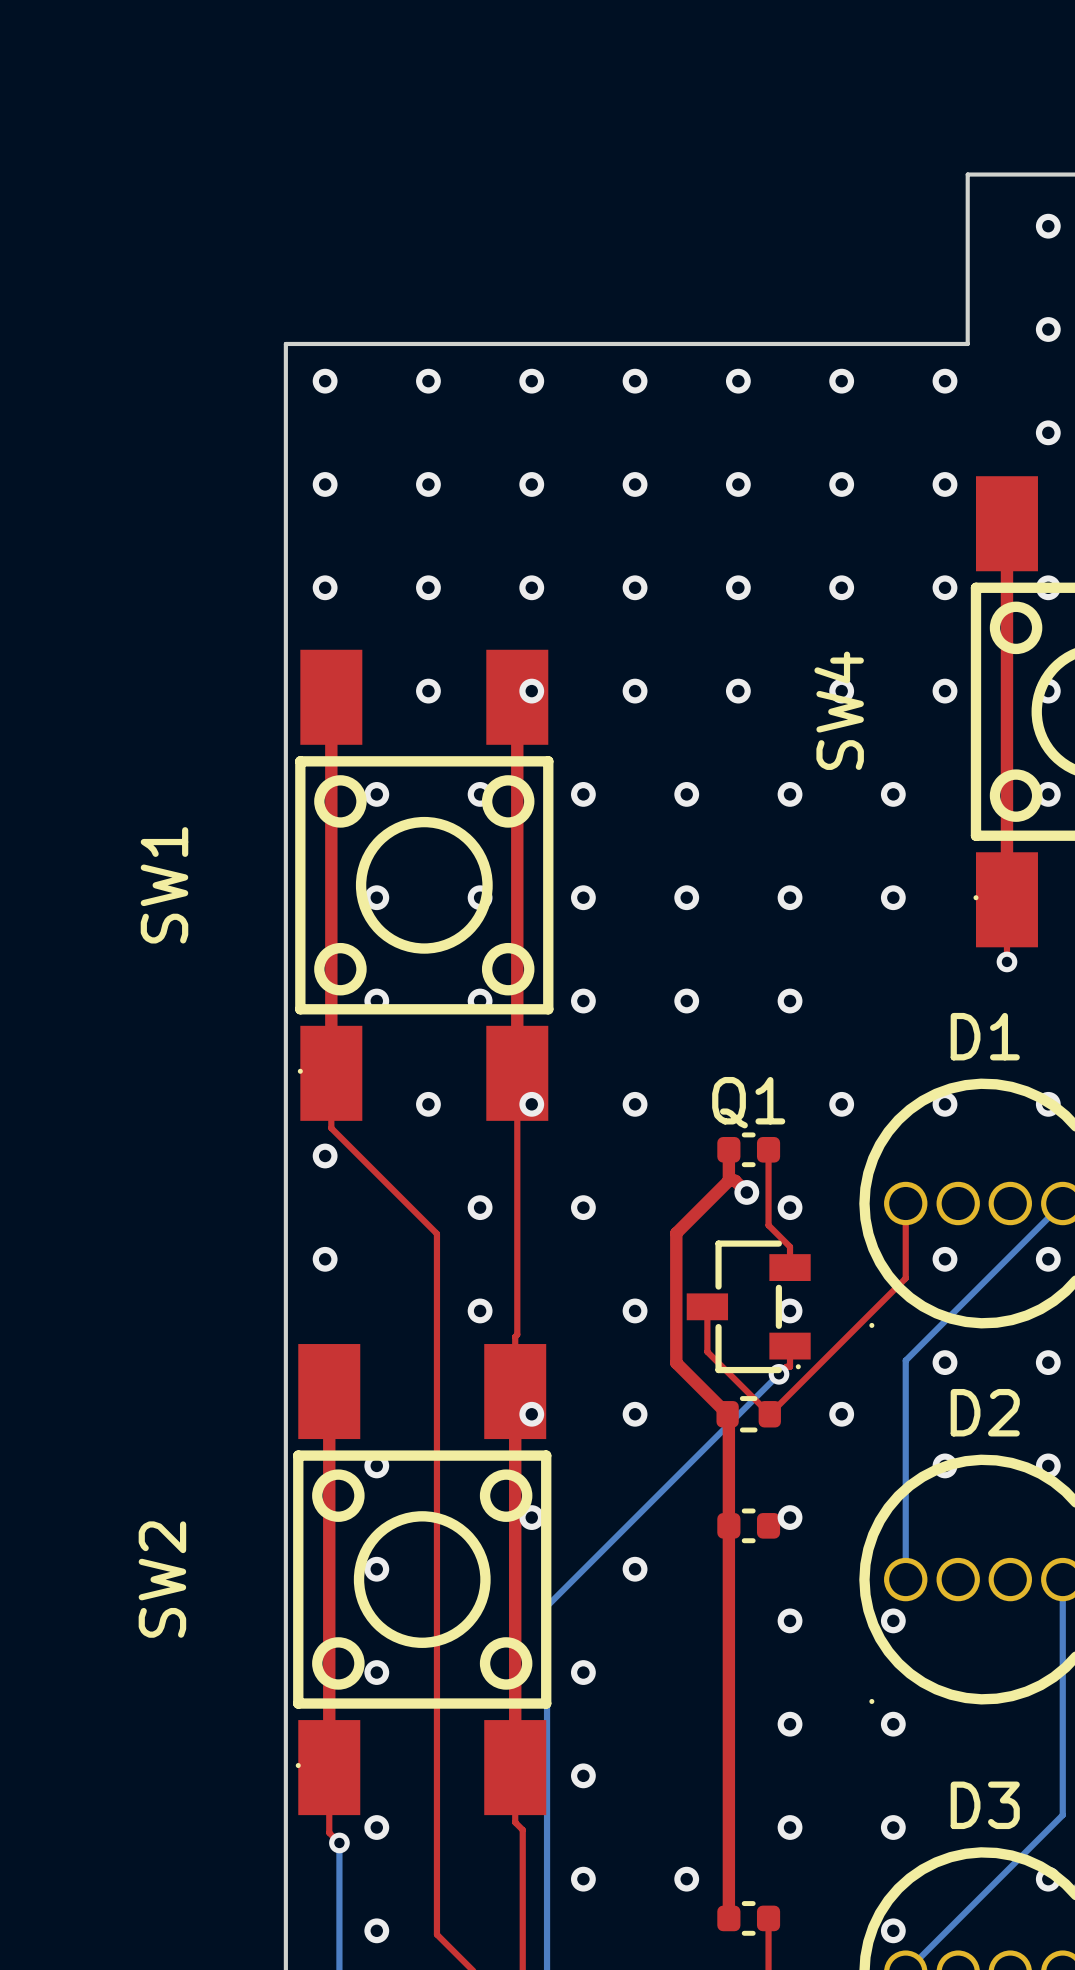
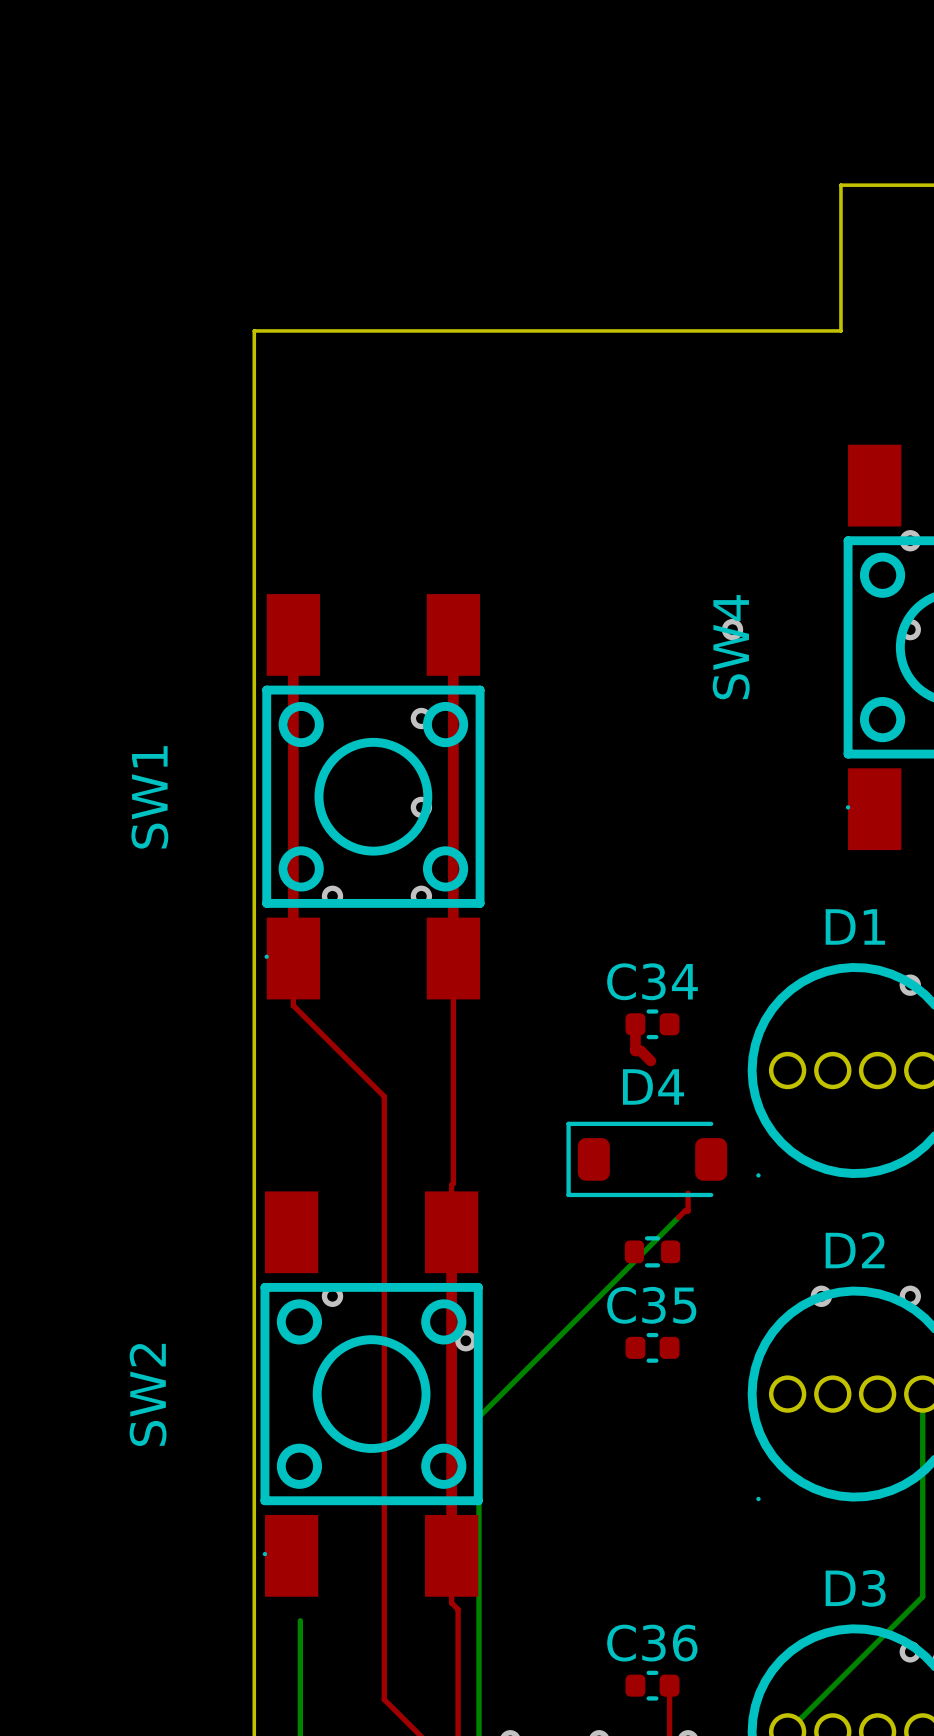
via: (1048, 226) -> none
via: (1048, 329) -> none
via: (325, 381) -> none
via: (428, 381) -> none
via: (531, 381) -> none
via: (635, 381) -> none
via: (738, 381) -> none
via: (841, 381) -> none
via: (944, 381) -> none
via: (1048, 432) -> none
via: (325, 484) -> none
via: (428, 484) -> none
via: (531, 484) -> none
via: (635, 484) -> none
via: (738, 484) -> none
via: (841, 484) -> none
via: (944, 484) -> none
top track: (1006, 523) (1006, 961) -> none
via: (325, 587) -> none
via: (428, 587) -> none
via: (531, 587) -> none
via: (635, 587) -> none
via: (738, 587) -> none
via: (841, 587) -> none
via: (944, 587) -> none
via: (428, 691) -> none
via: (531, 691) -> none
via: (635, 691) -> none
via: (738, 691) -> none
via: (944, 691) -> none
via: (376, 794) -> none
via: (583, 794) -> none
via: (686, 794) -> none
via: (790, 794) -> none
via: (893, 794) -> none
via: (1048, 794) -> none
via: (376, 897) -> none
via: (583, 897) -> none
via: (686, 897) -> none
via: (790, 897) -> none
via: (893, 897) -> none
via: (1006, 961) -> none
via: (583, 1001) -> none
via: (686, 1001) -> none
via: (790, 1001) -> none
C34 name: none -> C34 (652, 981)
via: (428, 1104) -> none
via: (531, 1104) -> none
via: (635, 1104) -> none
via: (841, 1104) -> none
via: (944, 1104) -> none
top track: (768, 1149) (768, 1225) (790, 1246) (790, 1267) -> none
via: (325, 1155) -> none
top track: (728, 1180) (676, 1233) (676, 1362) (728, 1415) (728, 1918) -> none
via: (746, 1192) -> none
top track: (905, 1203) (905, 1278) (769, 1414) (707, 1351) (707, 1306) -> none
bottom track: (1062, 1203) (905, 1360) (905, 1579) -> none
via: (480, 1207) -> none
via: (583, 1207) -> none
via: (790, 1207) -> none
via: (325, 1259) -> none
via: (944, 1259) -> none
via: (1048, 1259) -> none
D4: none -> (646, 1159)
Q1: (748, 1306) -> none
via: (480, 1310) -> none
via: (635, 1310) -> none
via: (790, 1310) -> none
via: (944, 1362) -> none
via: (1048, 1362) -> none
via: (778, 1374) -> none
top track: (329, 1391) (329, 1832) (339, 1842) -> none
via: (531, 1414) -> none
via: (635, 1414) -> none
via: (841, 1414) -> none
C35 name: none -> C35 (651, 1305)
via: (790, 1517) -> none
via: (376, 1569) -> none
via: (635, 1569) -> none
via: (790, 1620) -> none
via: (893, 1620) -> none
via: (376, 1672) -> none
via: (583, 1672) -> none
via: (790, 1724) -> none
via: (893, 1724) -> none
via: (583, 1775) -> none
via: (376, 1827) -> none
via: (790, 1827) -> none
via: (893, 1827) -> none
via: (339, 1842) -> none
C36 name: none -> C36 (652, 1643)
via: (583, 1879) -> none
via: (686, 1879) -> none
via: (376, 1930) -> none
via: (893, 1930) -> none

